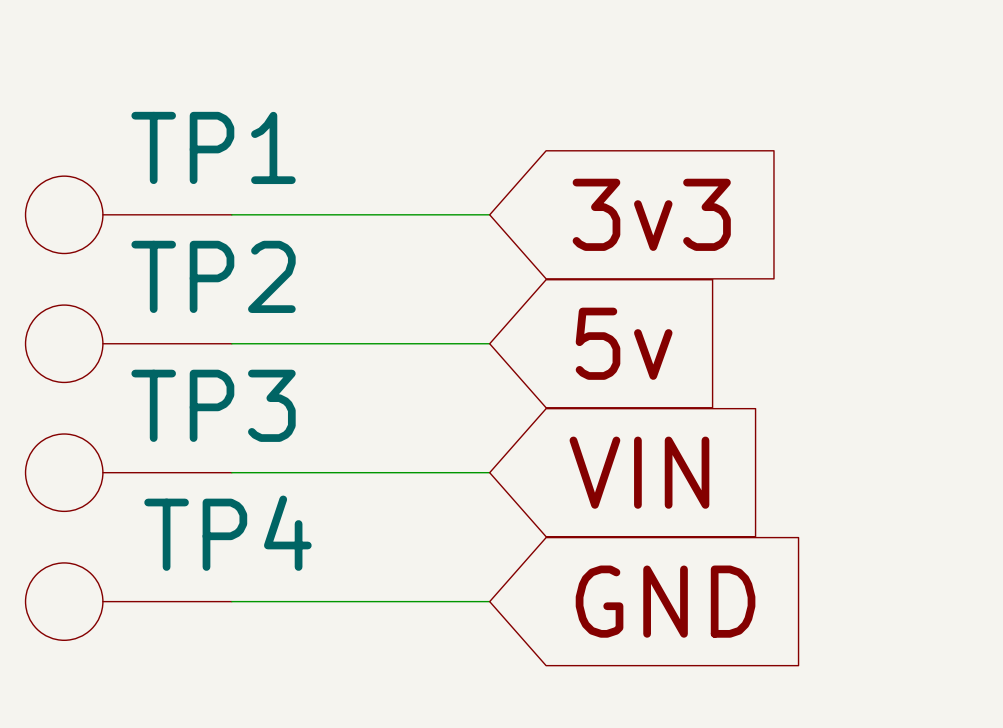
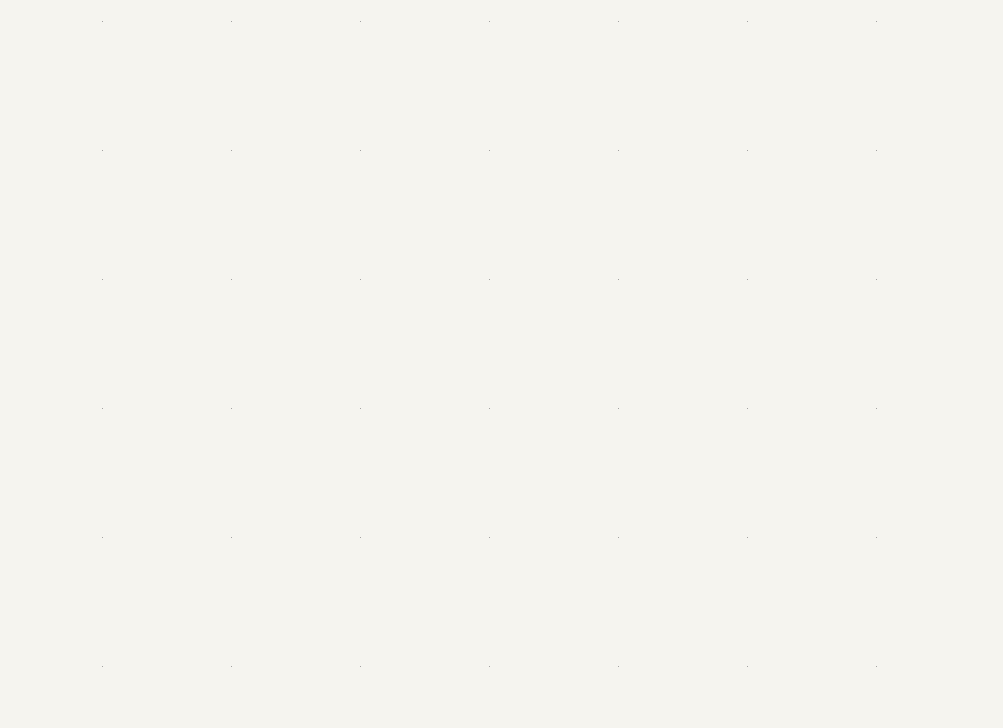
TP1: (128, 214) -> none
wire: (231, 214) (489, 214) -> none
global label: 3v3 (651, 214) -> none
TP2: (128, 343) -> none
wire: (231, 343) (489, 343) -> none
global label: 5v (624, 343) -> none
TP3: (128, 472) -> none
wire: (231, 472) (489, 472) -> none
global label: VIN (639, 472) -> none
TP4: (128, 601) -> none
wire: (231, 601) (489, 601) -> none
global label: GND (665, 601) -> none

